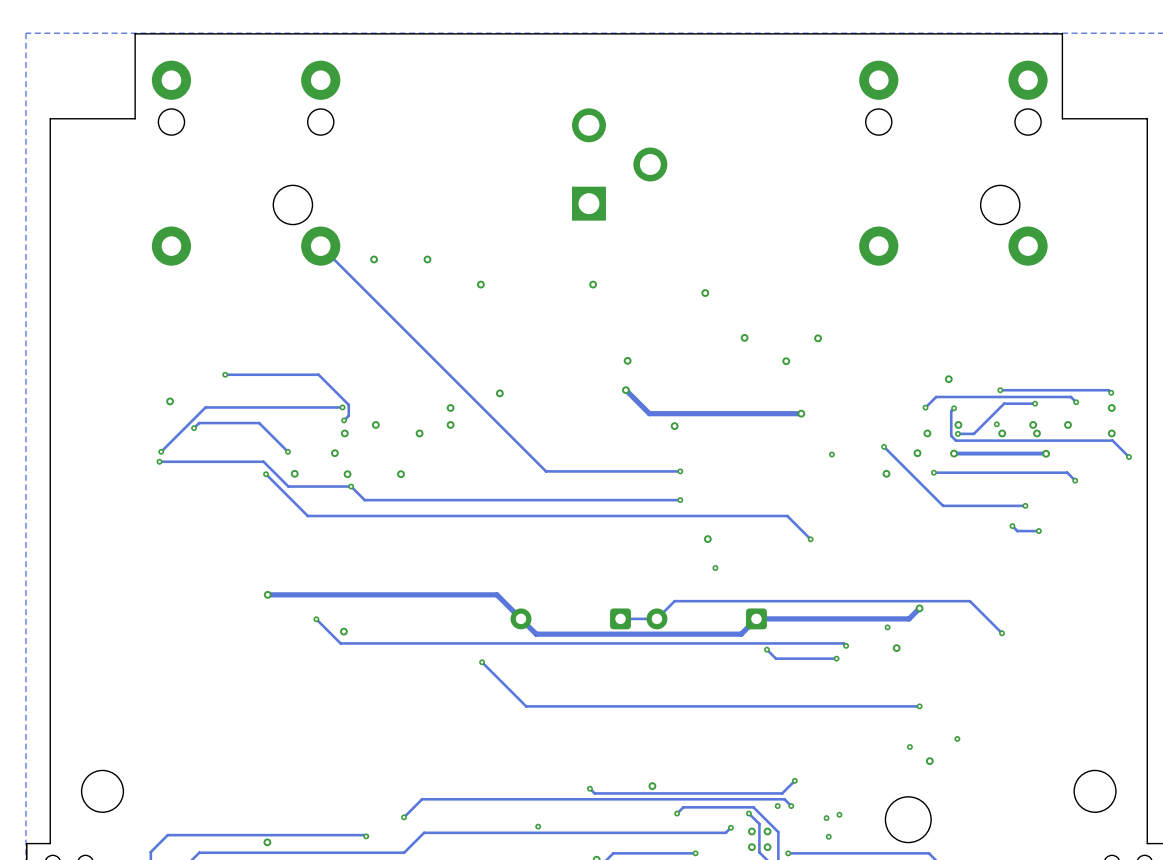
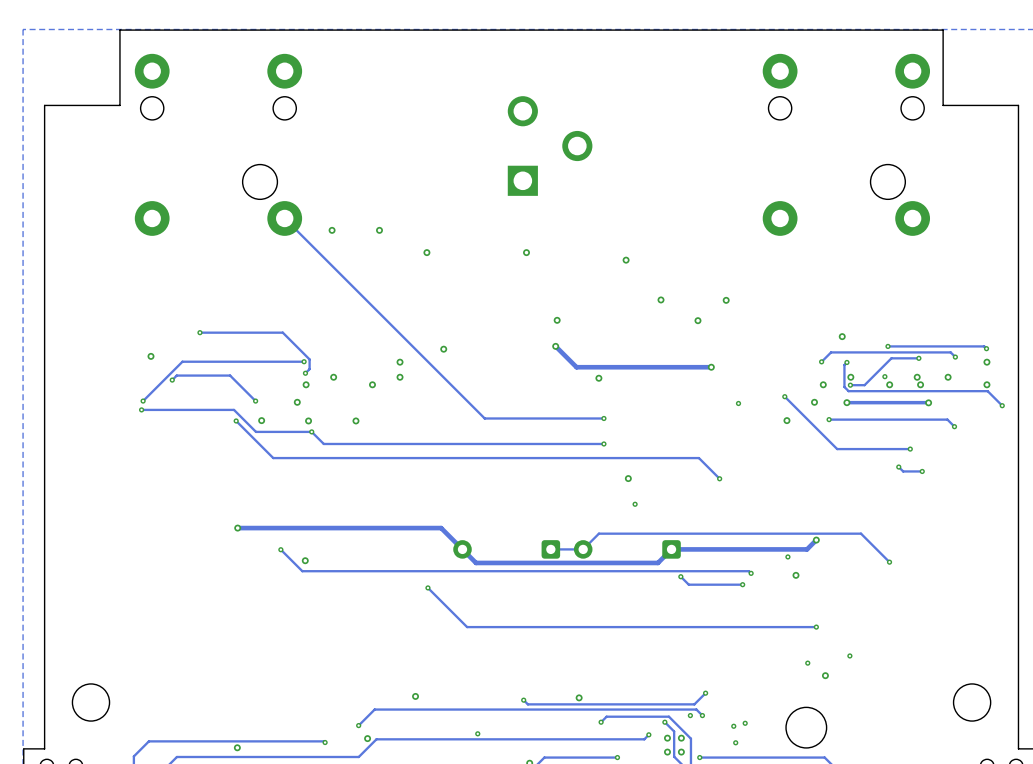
via: none -> (415, 696)
via: none -> (367, 738)

